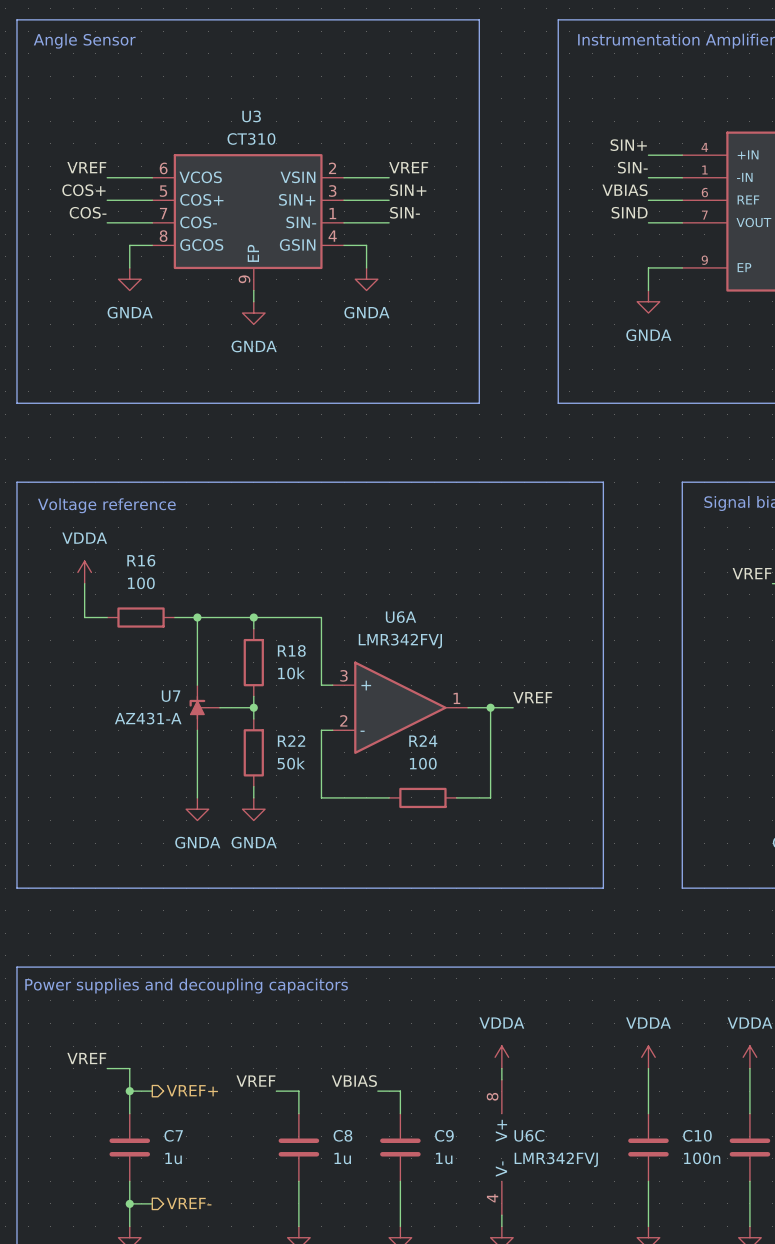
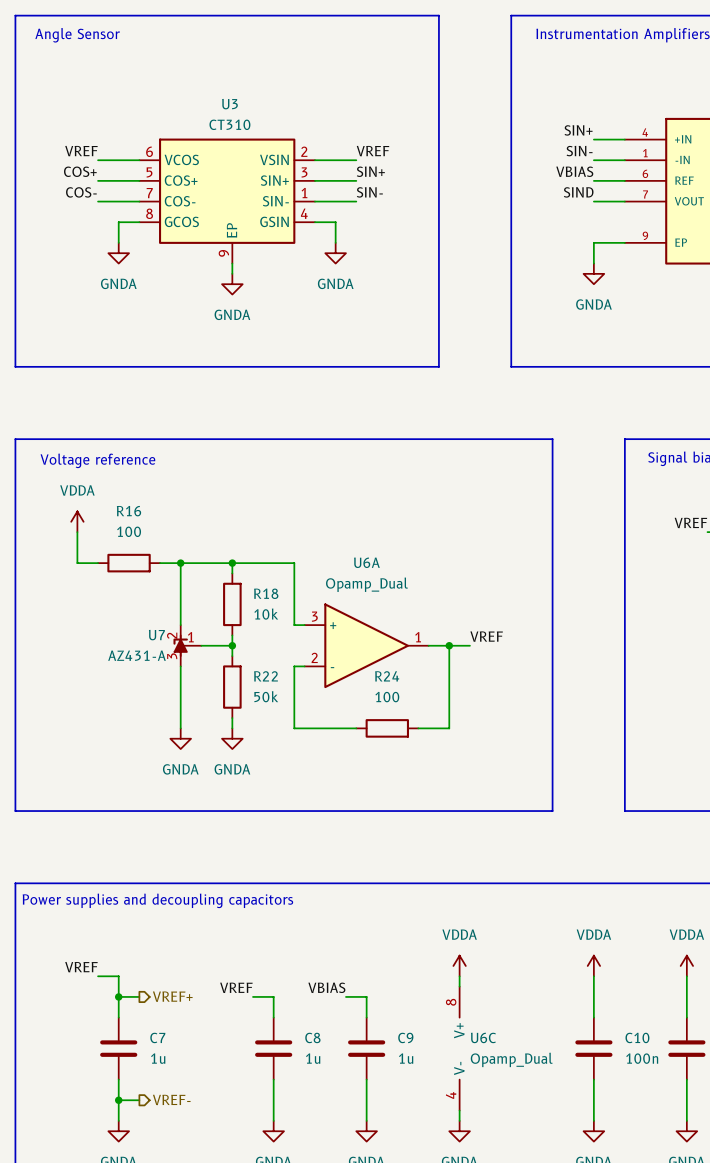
U6A value: LMR342FVJ (400, 641) -> Opamp_Dual (366, 584)
U7 pin number: none -> 2 (172, 635)
U7 pin number: none -> 1 (190, 637)
U7 pin number: none -> 3 (172, 656)
U6C value: LMR342FVJ (556, 1159) -> Opamp_Dual (511, 1059)

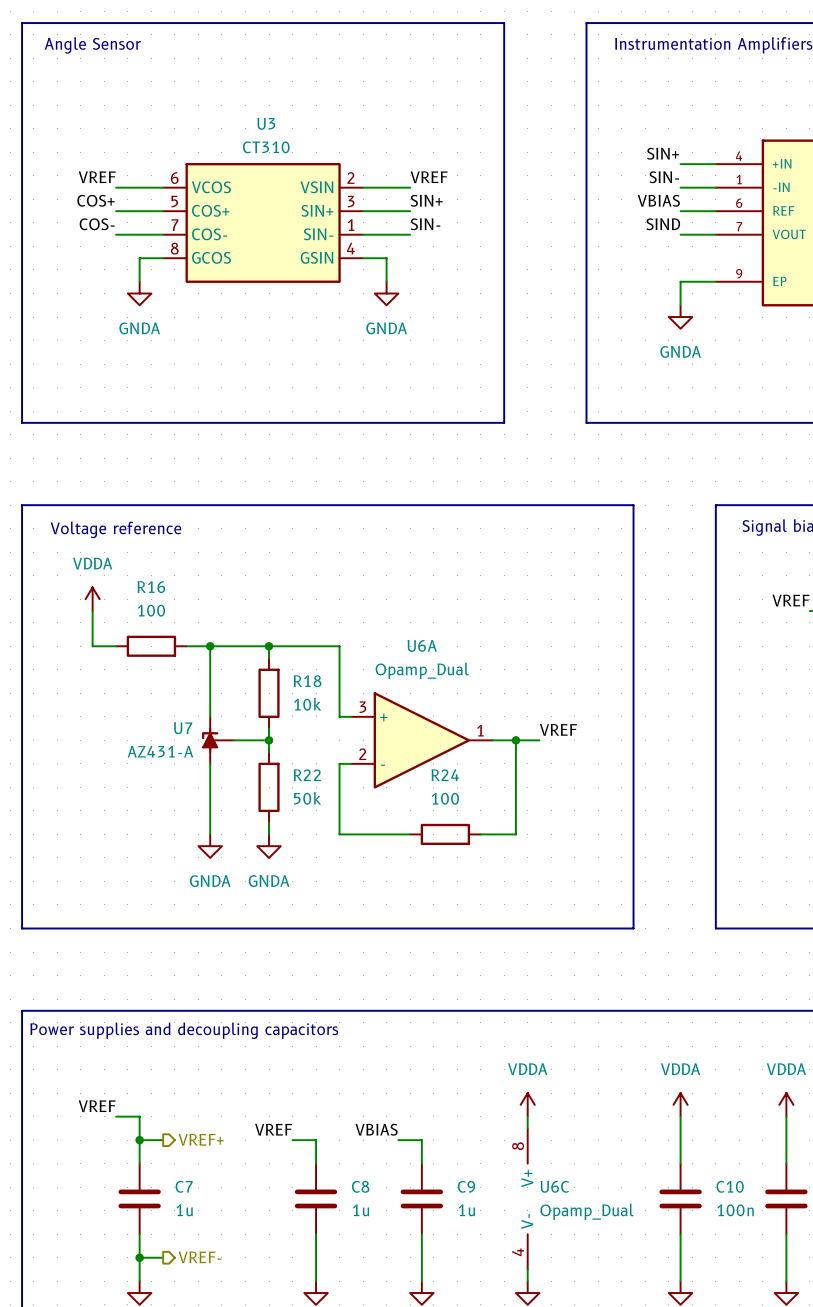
U3 symbol: [139, 138, 315, 264] -> [163, 162, 364, 283]
wire: (232, 263) (232, 273) -> none
power symbol: GNDA (232, 284) -> none
U7 pin number: 2 (172, 635) -> none
U7 pin number: 1 (190, 637) -> none
U7 pin number: 3 (172, 656) -> none

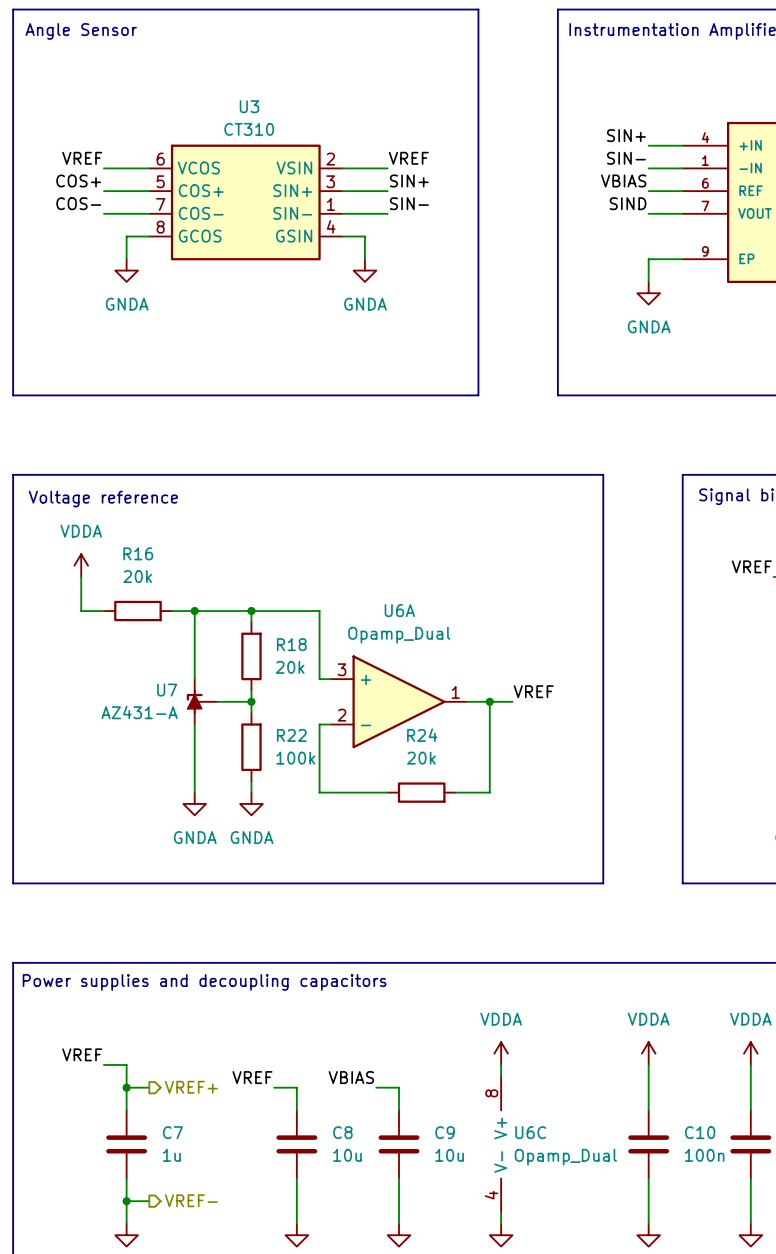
R16 value: 100 (151, 610) -> 20k (137, 576)
R18 value: 10k (307, 704) -> 20k (290, 667)
R22 value: 50k (307, 798) -> 100k (295, 758)
R24 value: 100 (445, 798) -> 20k (421, 758)
C8 value: 1u (360, 1210) -> 10u (347, 1155)
C9 value: 1u (466, 1210) -> 10u (449, 1155)

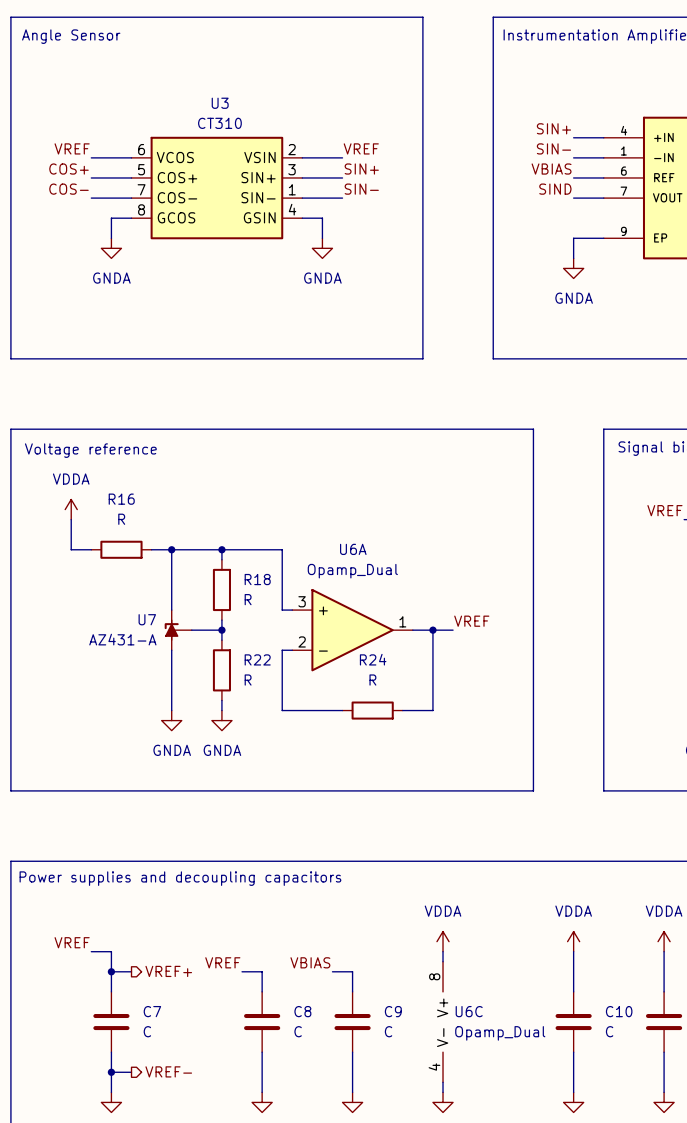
R16 value: 20k (137, 576) -> R (121, 519)
R18 value: 20k (290, 667) -> R (248, 599)
R22 value: 100k (295, 758) -> R (248, 680)
R24 value: 20k (421, 758) -> R (372, 680)
C7 value: 1u (171, 1155) -> C (147, 1031)
C8 value: 10u (347, 1155) -> C (298, 1031)
C9 value: 10u (449, 1155) -> C (388, 1031)
C10 value: 100n (704, 1155) -> C (609, 1031)

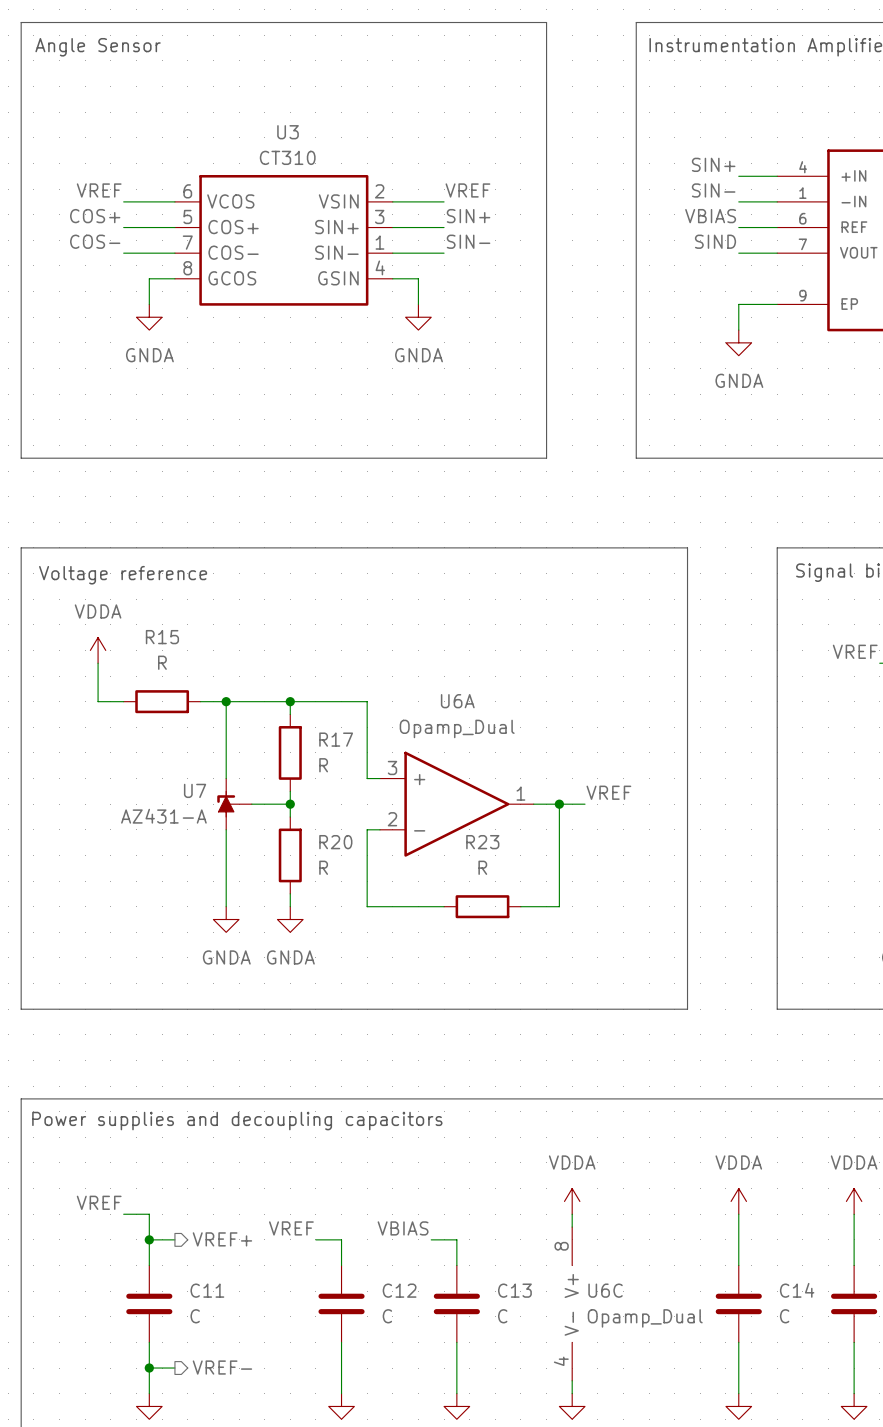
R16 name: R16 (121, 499) -> R15 (162, 637)
R18 name: R18 (257, 579) -> R17 (336, 739)
R22 name: R22 (257, 659) -> R20 (335, 842)
R24 name: R24 (373, 659) -> R23 (482, 842)
C7 name: C7 (152, 1011) -> C11 (207, 1290)
C8 name: C8 (302, 1011) -> C12 (399, 1290)
C9 name: C9 (393, 1011) -> C13 (514, 1290)
C10 name: C10 (619, 1011) -> C14 (797, 1290)

